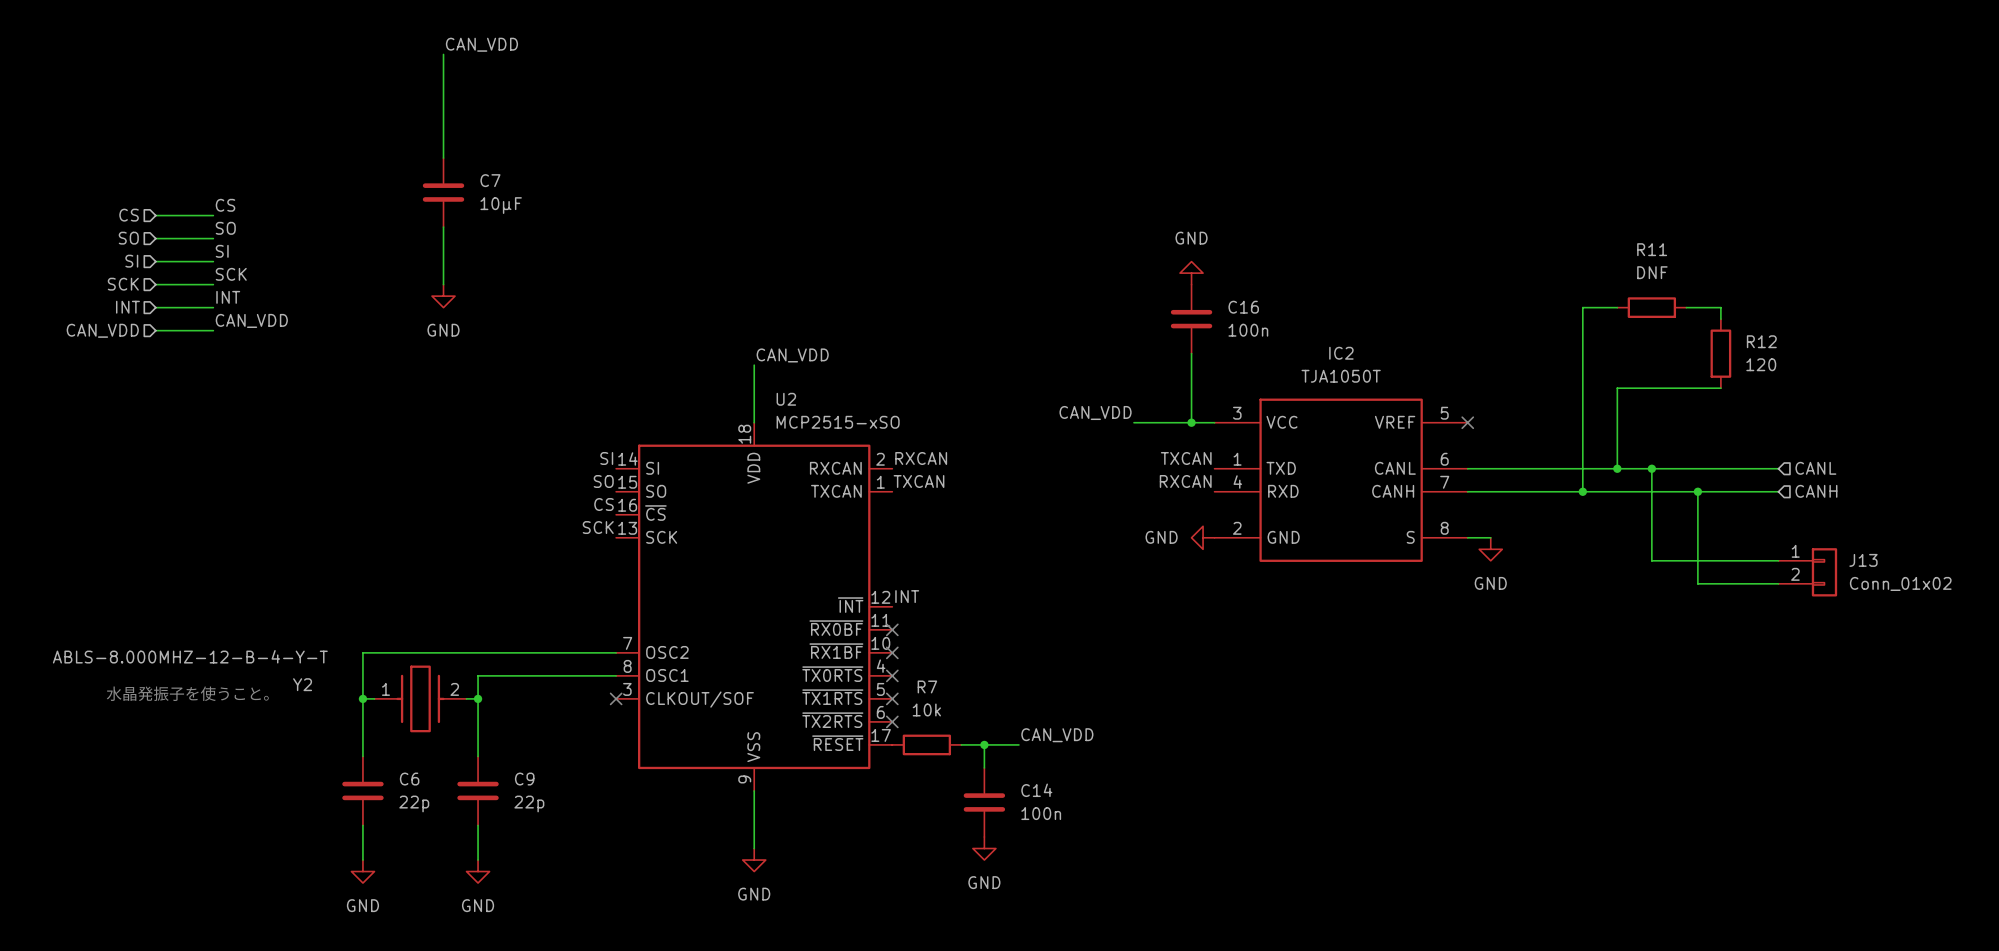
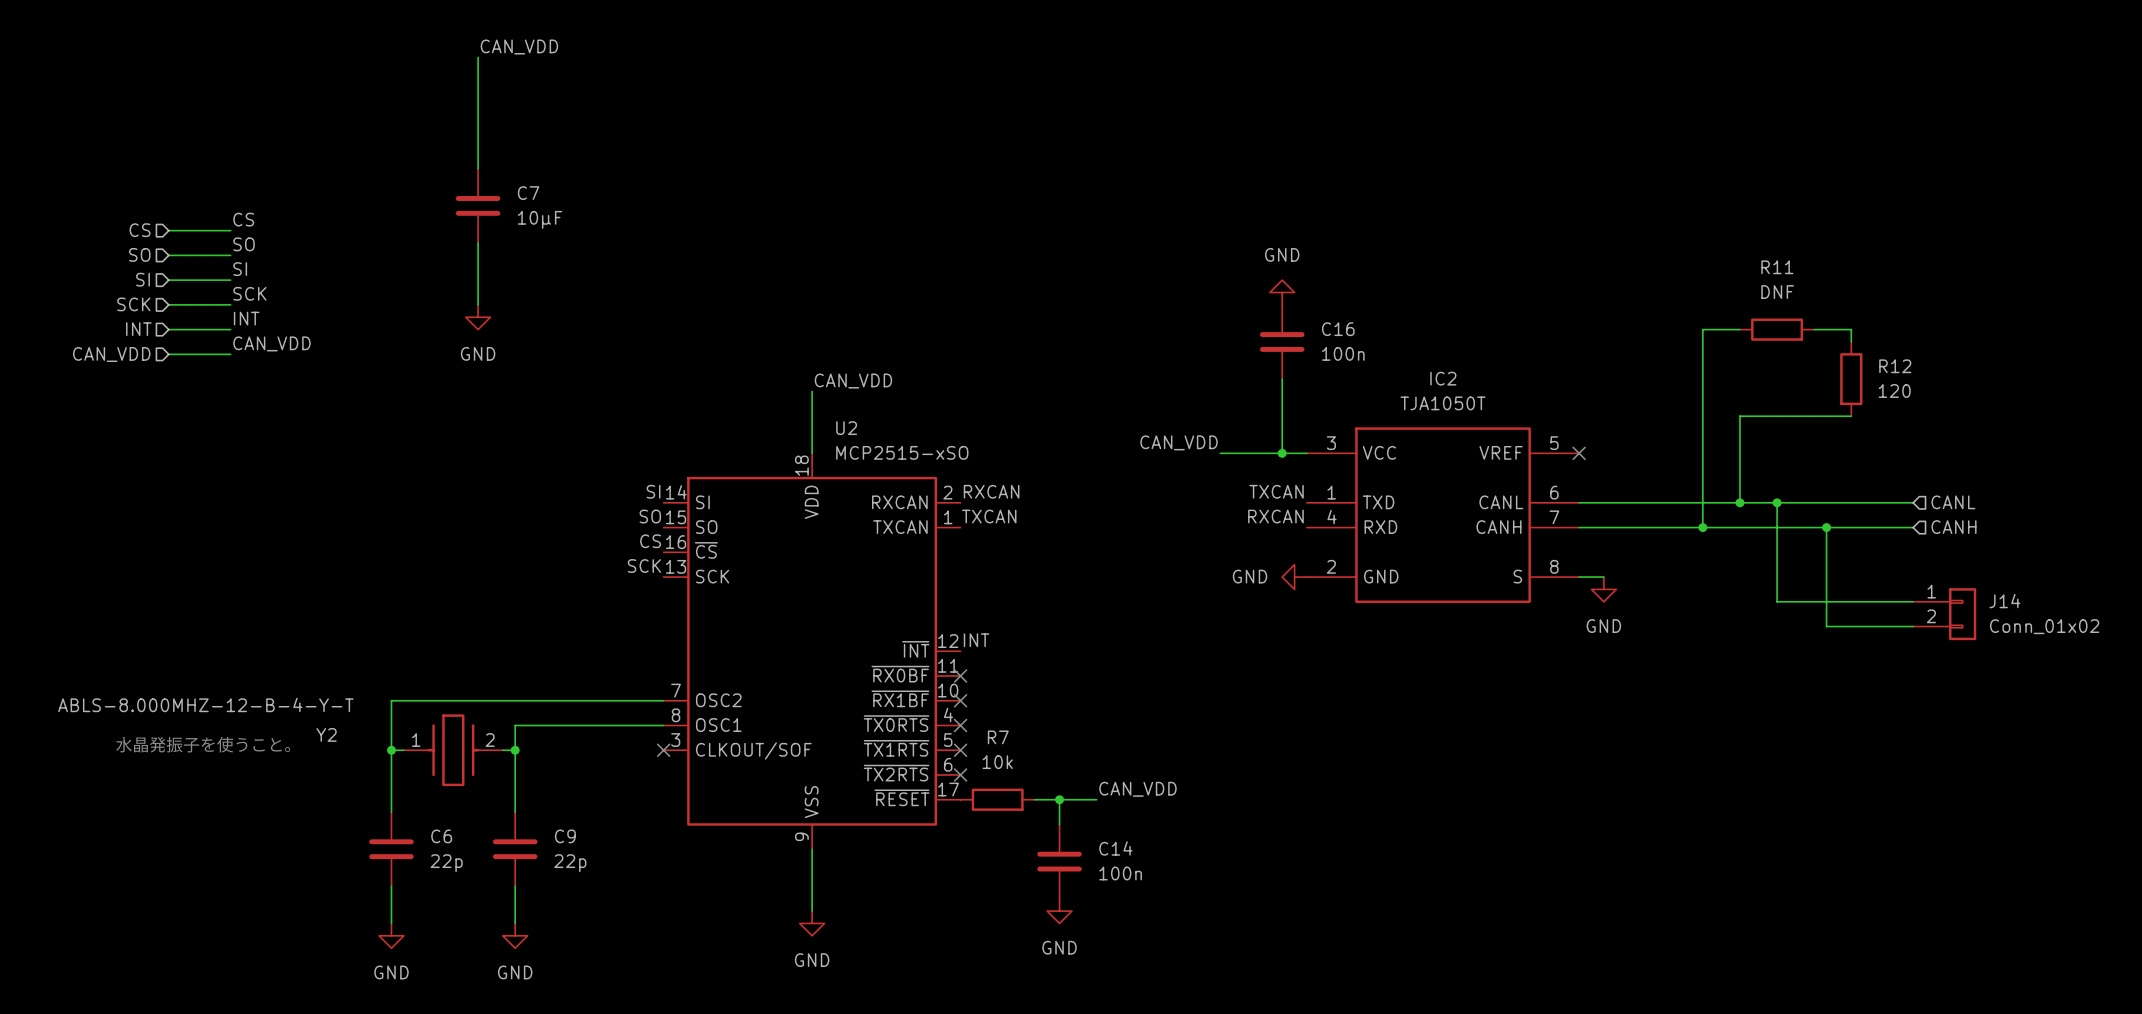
J13 name: J13 (1863, 560) -> J14 (2004, 601)

